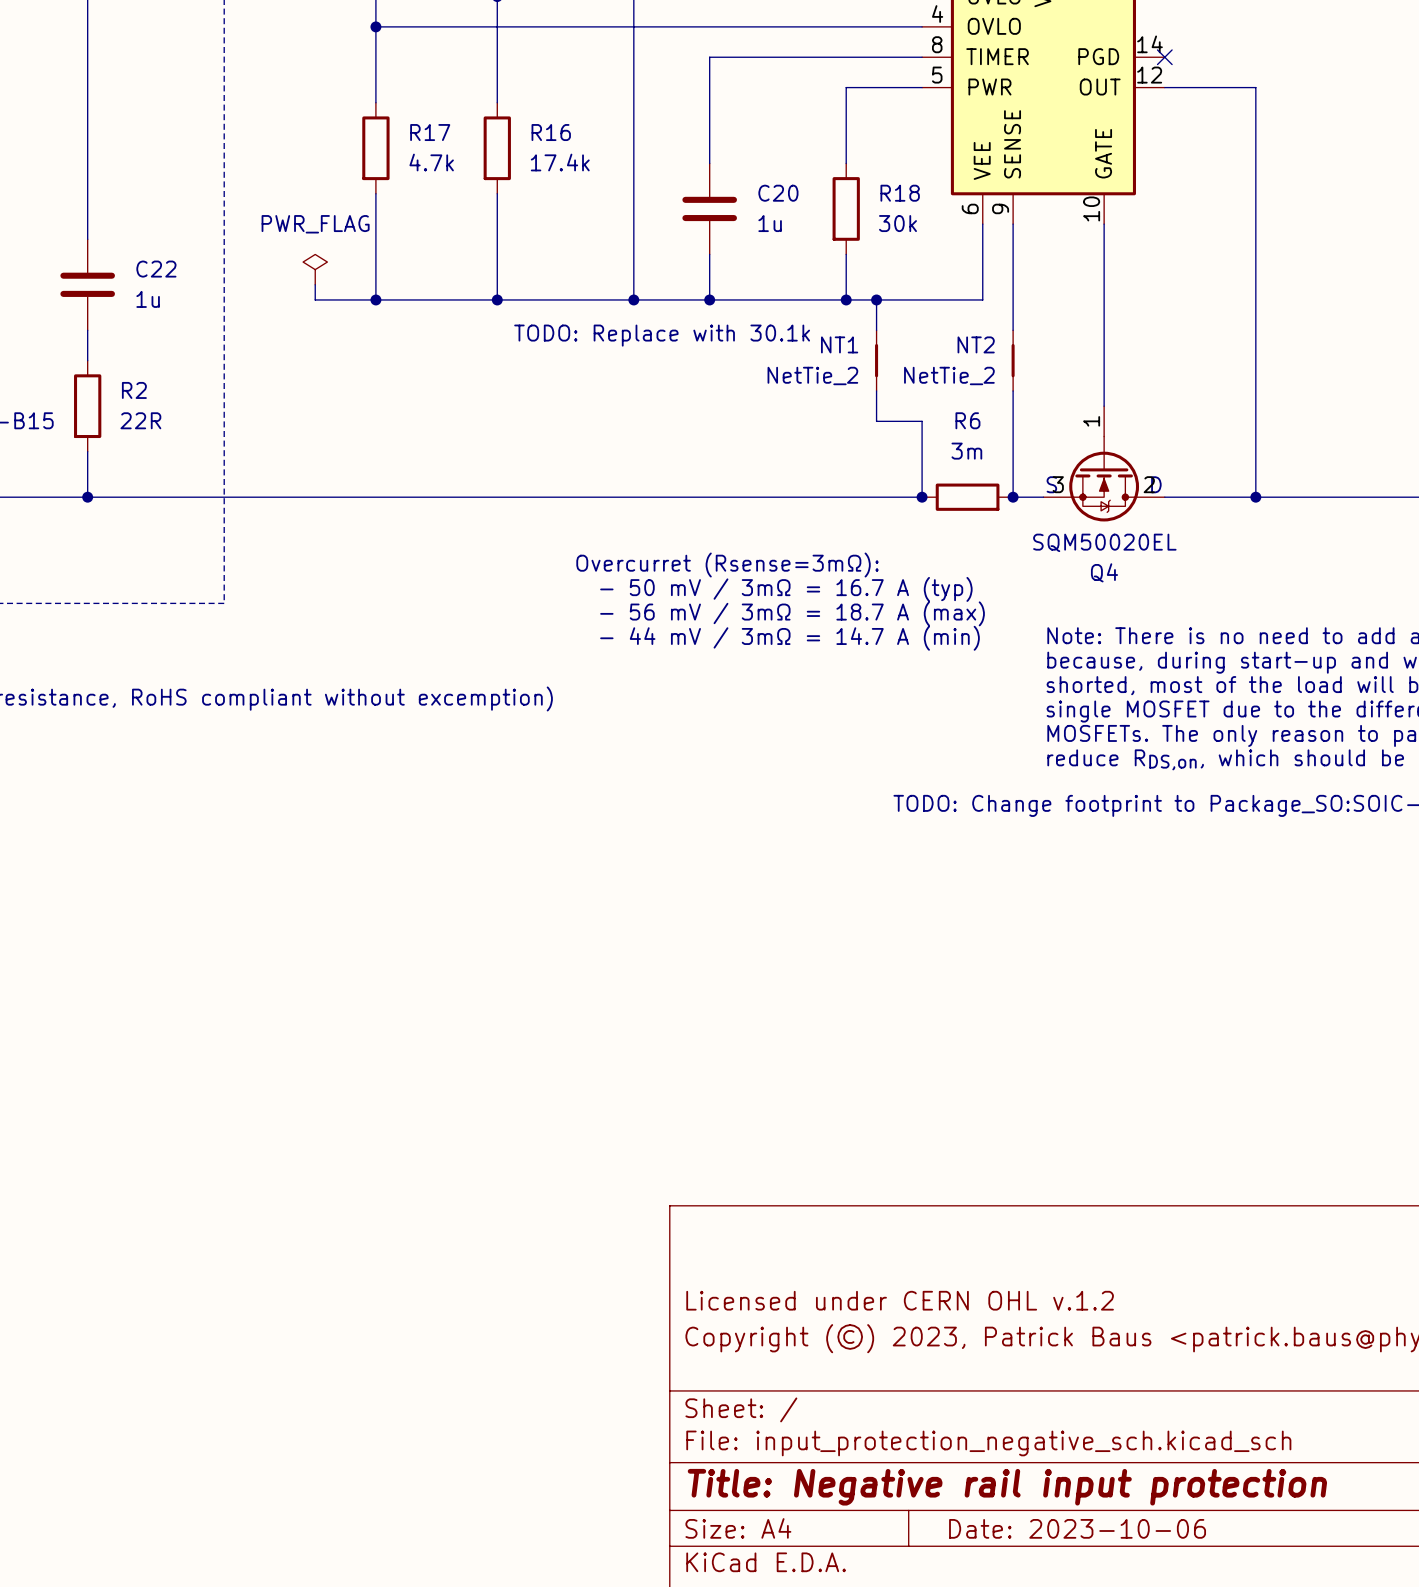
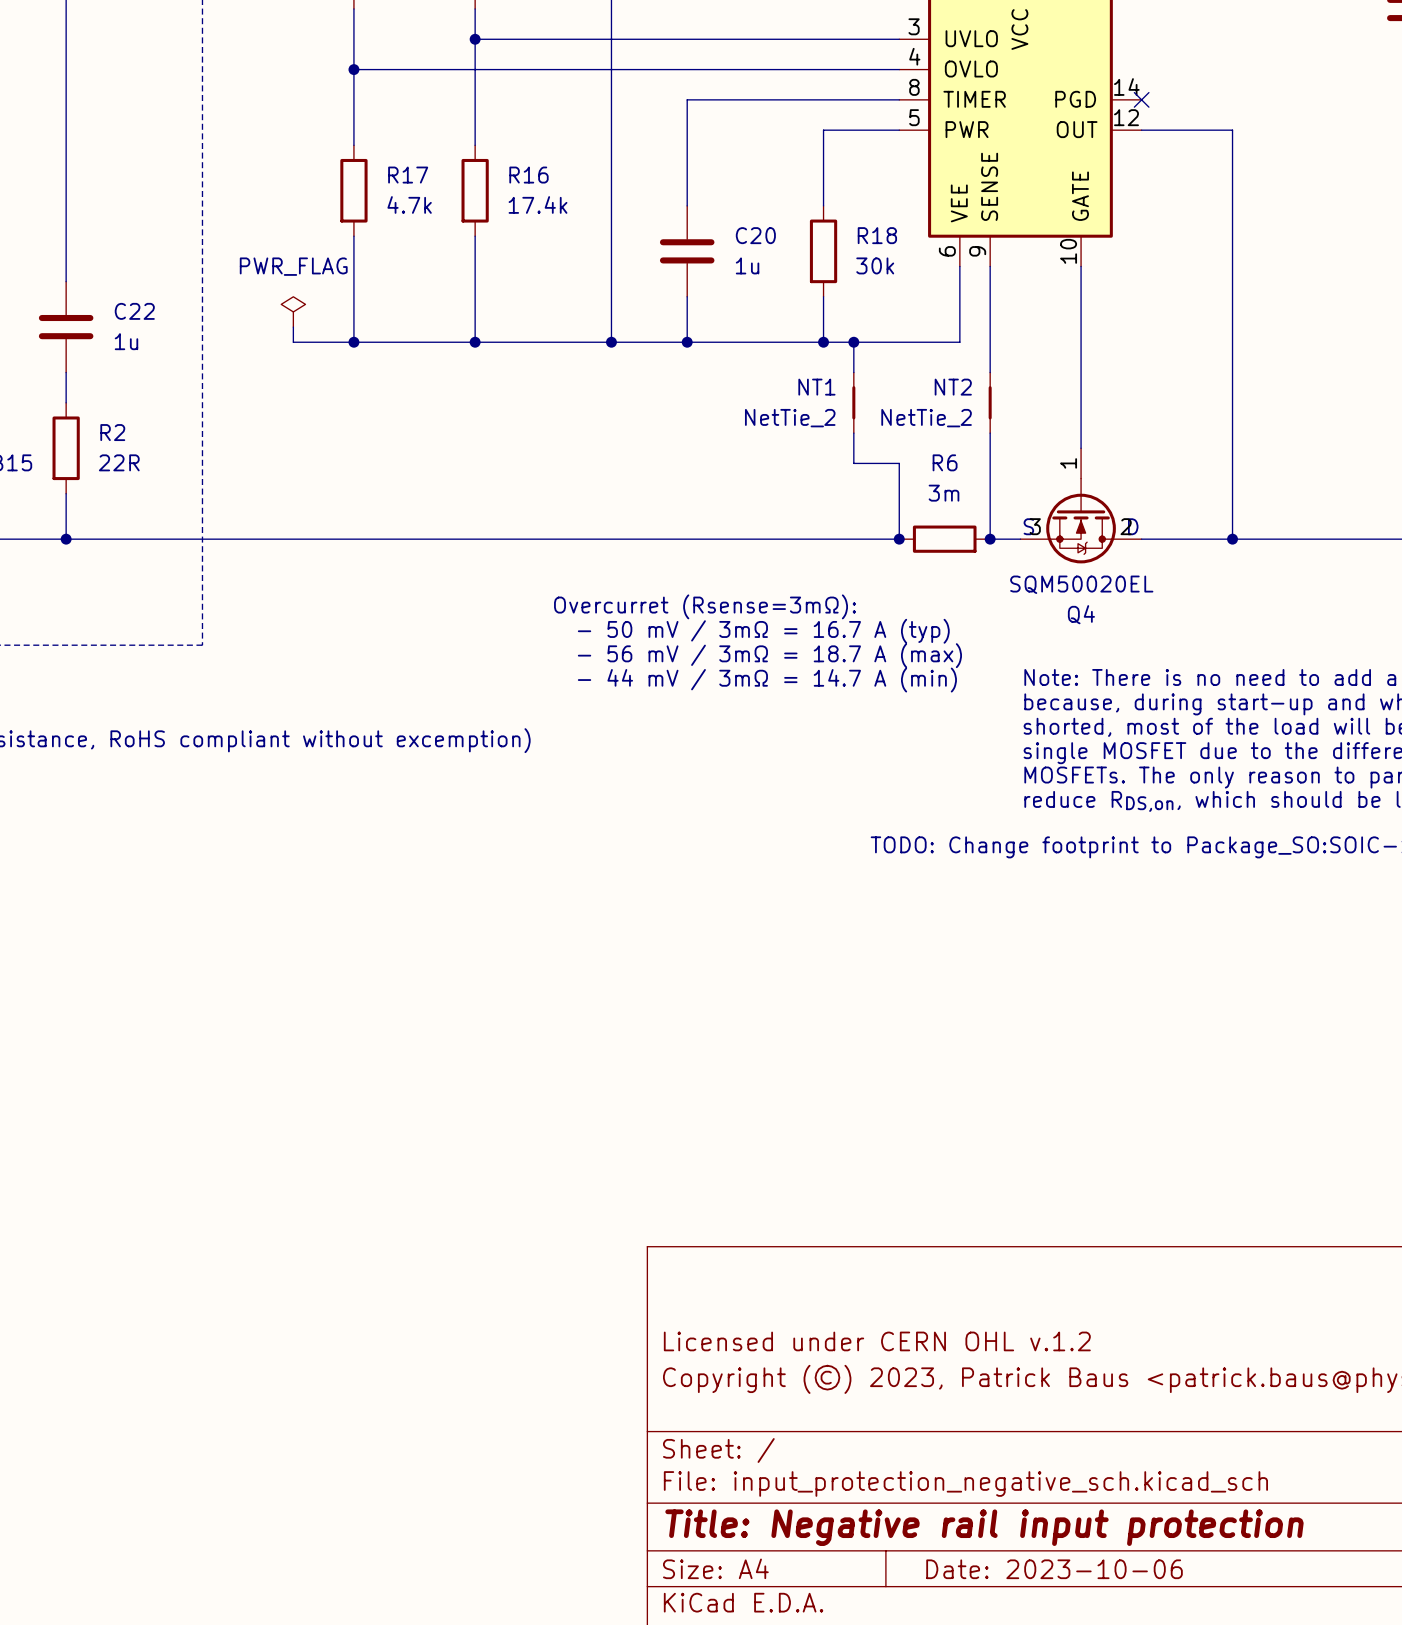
text: TODO: Replace with 30.1k (662, 335) -> none

